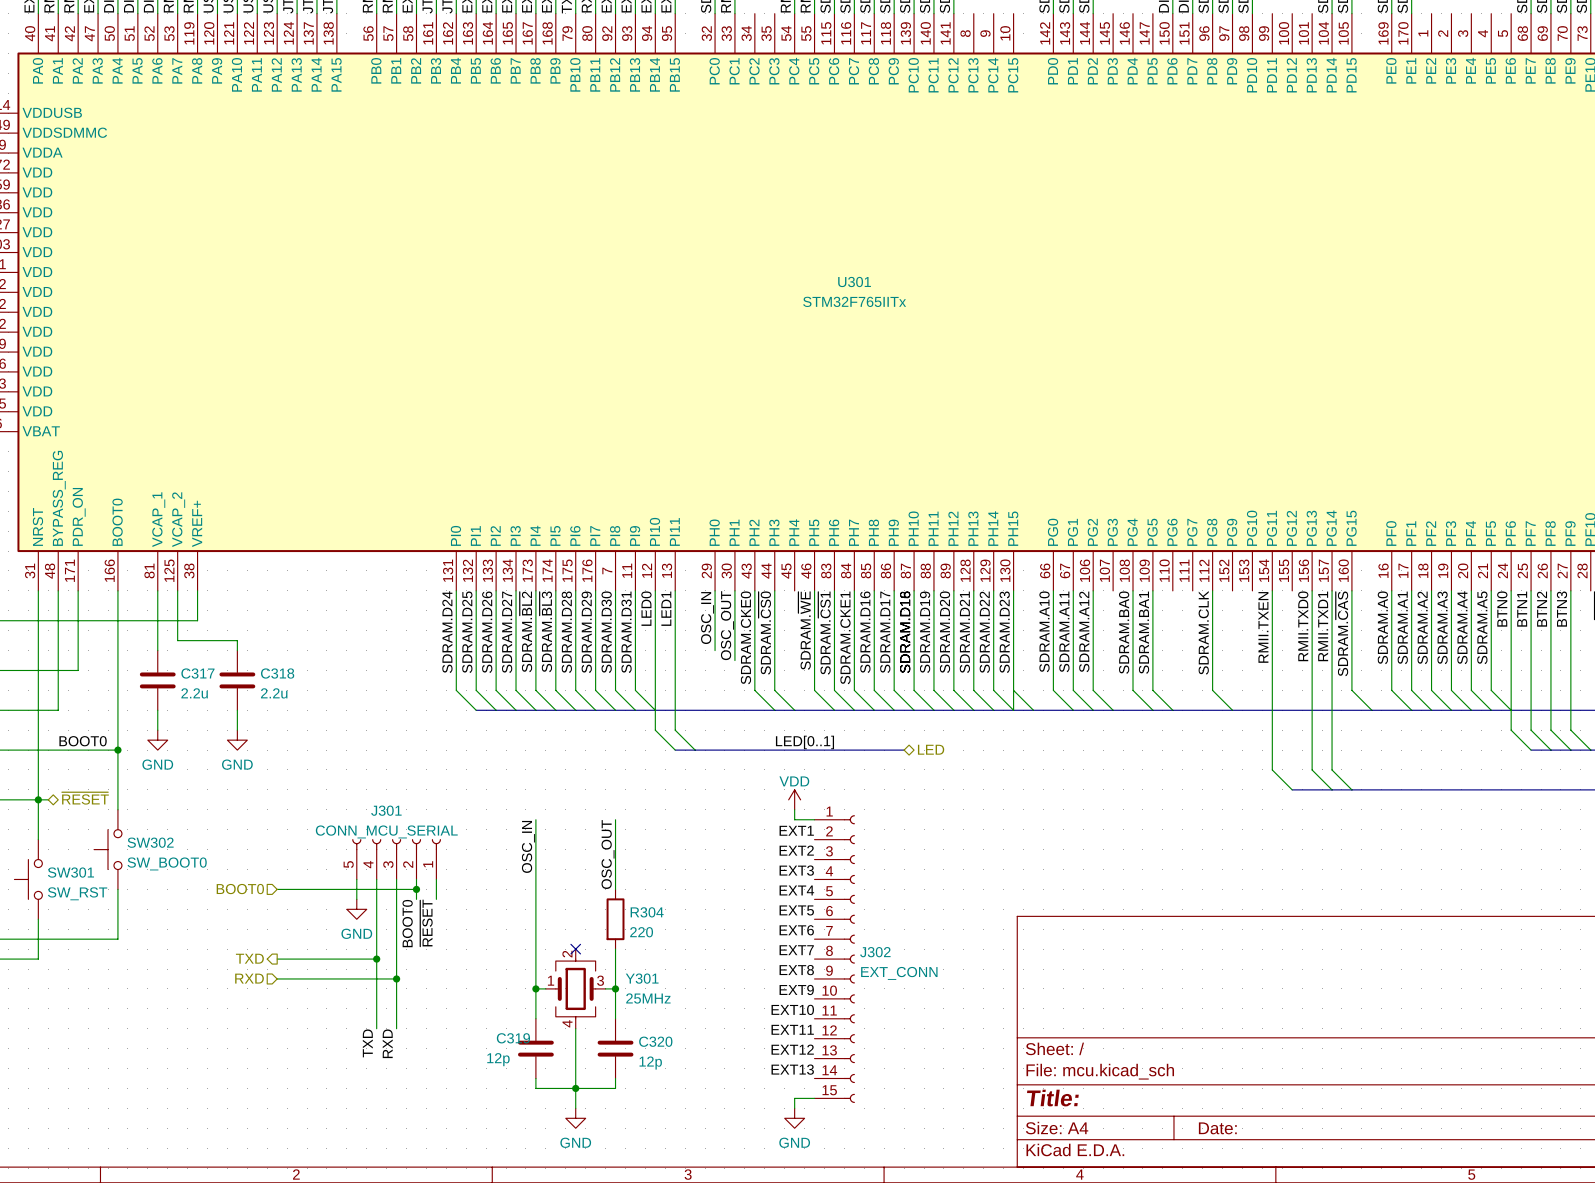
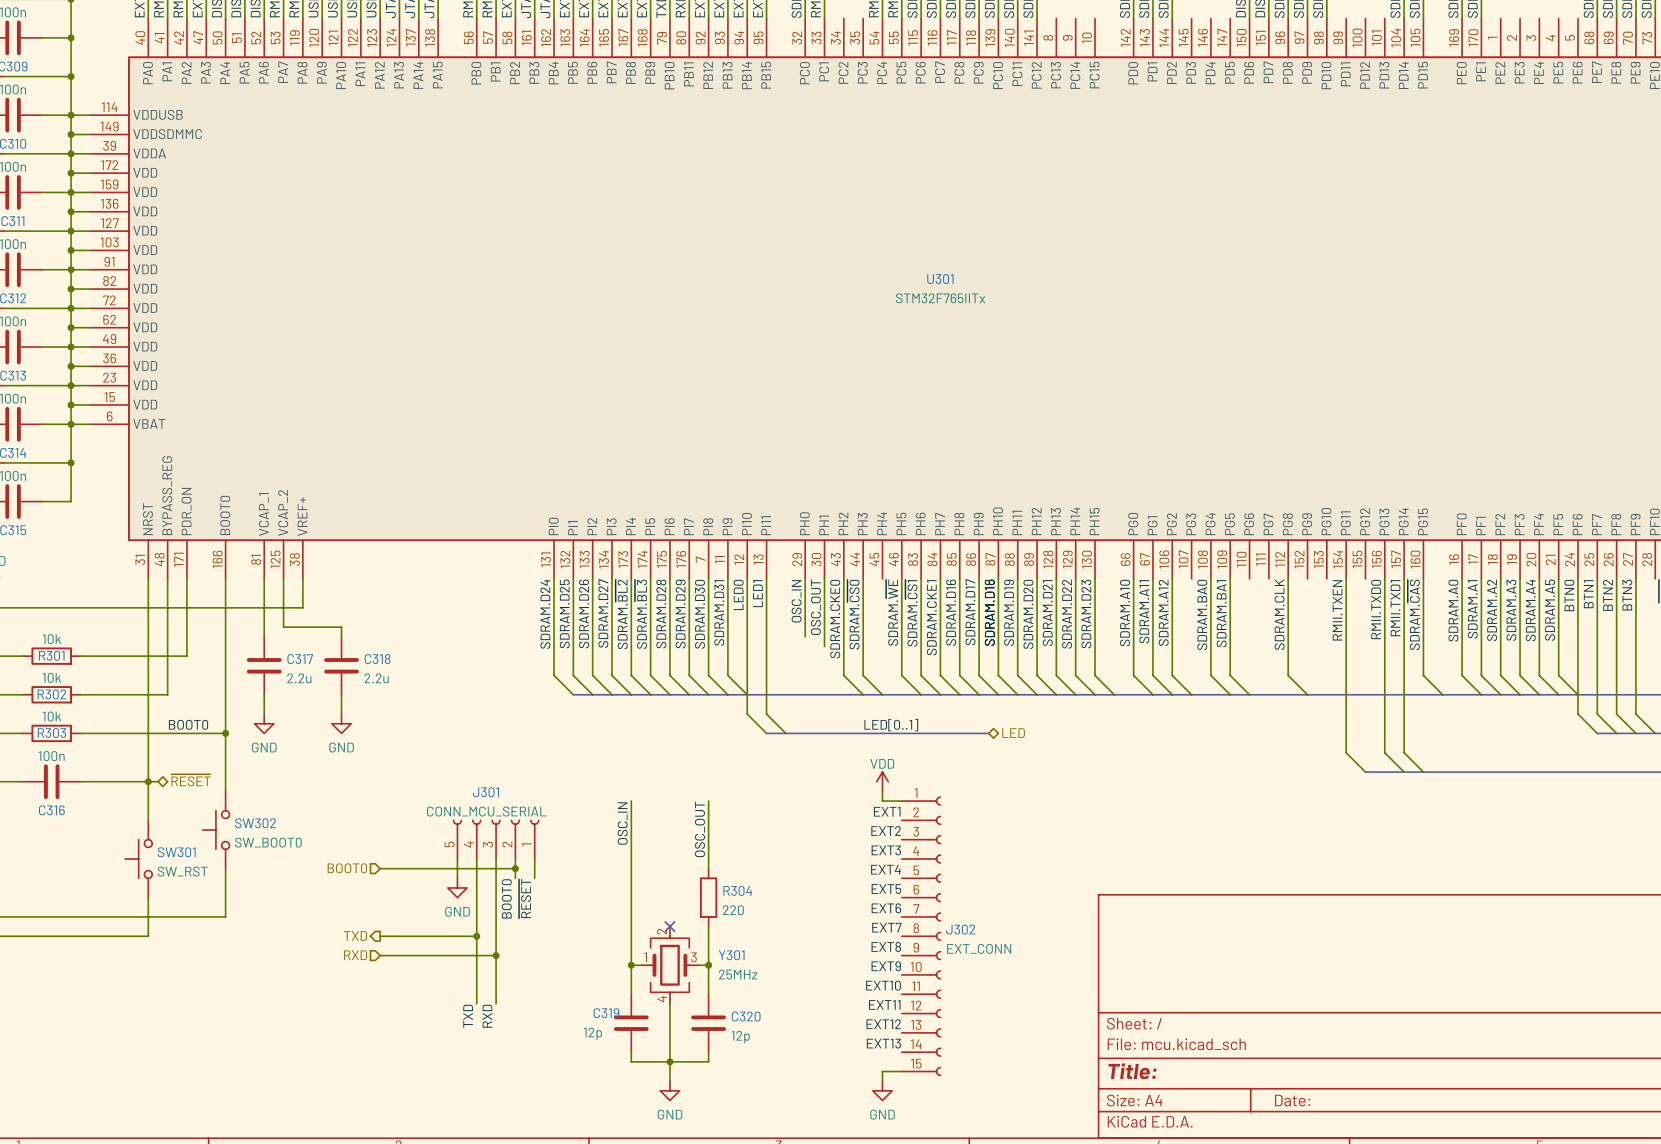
wire: (1013, 690) (1013, 710) -> none

